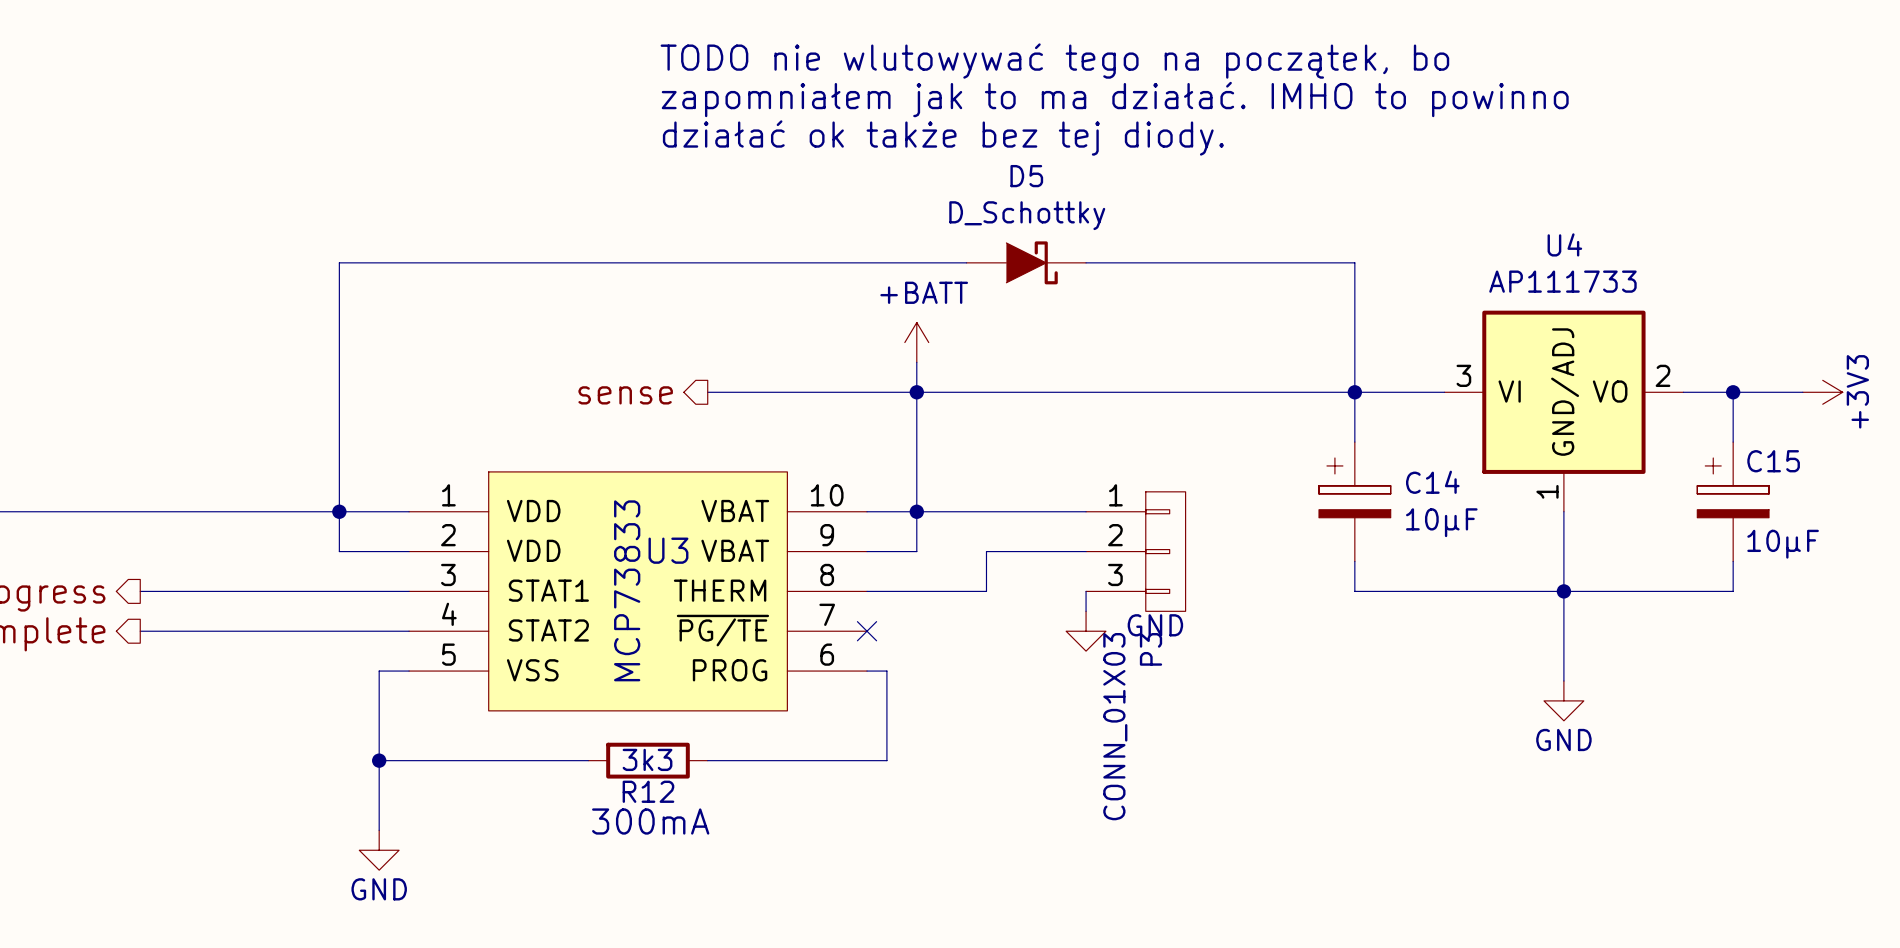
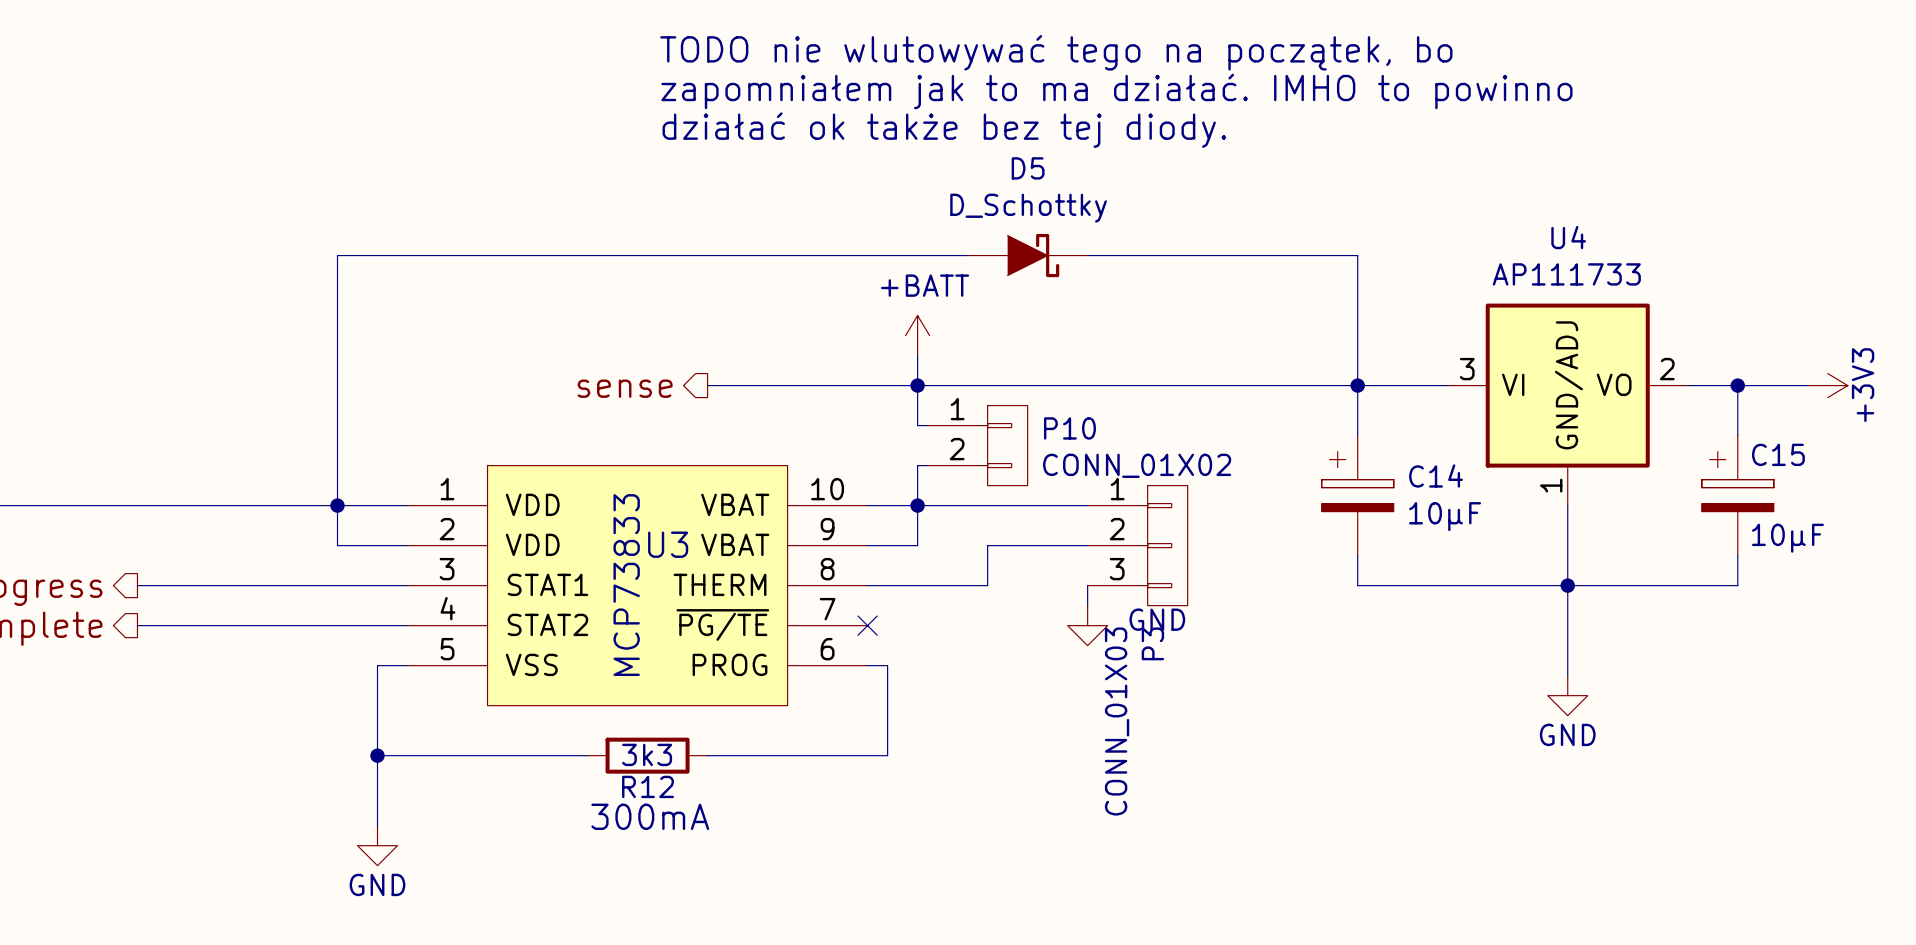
wire: (916, 432) (916, 471) -> (917, 425) (927, 425)
P10: none -> CONN_01X02 (977, 445)
wire: none -> (917, 465) (927, 465)

